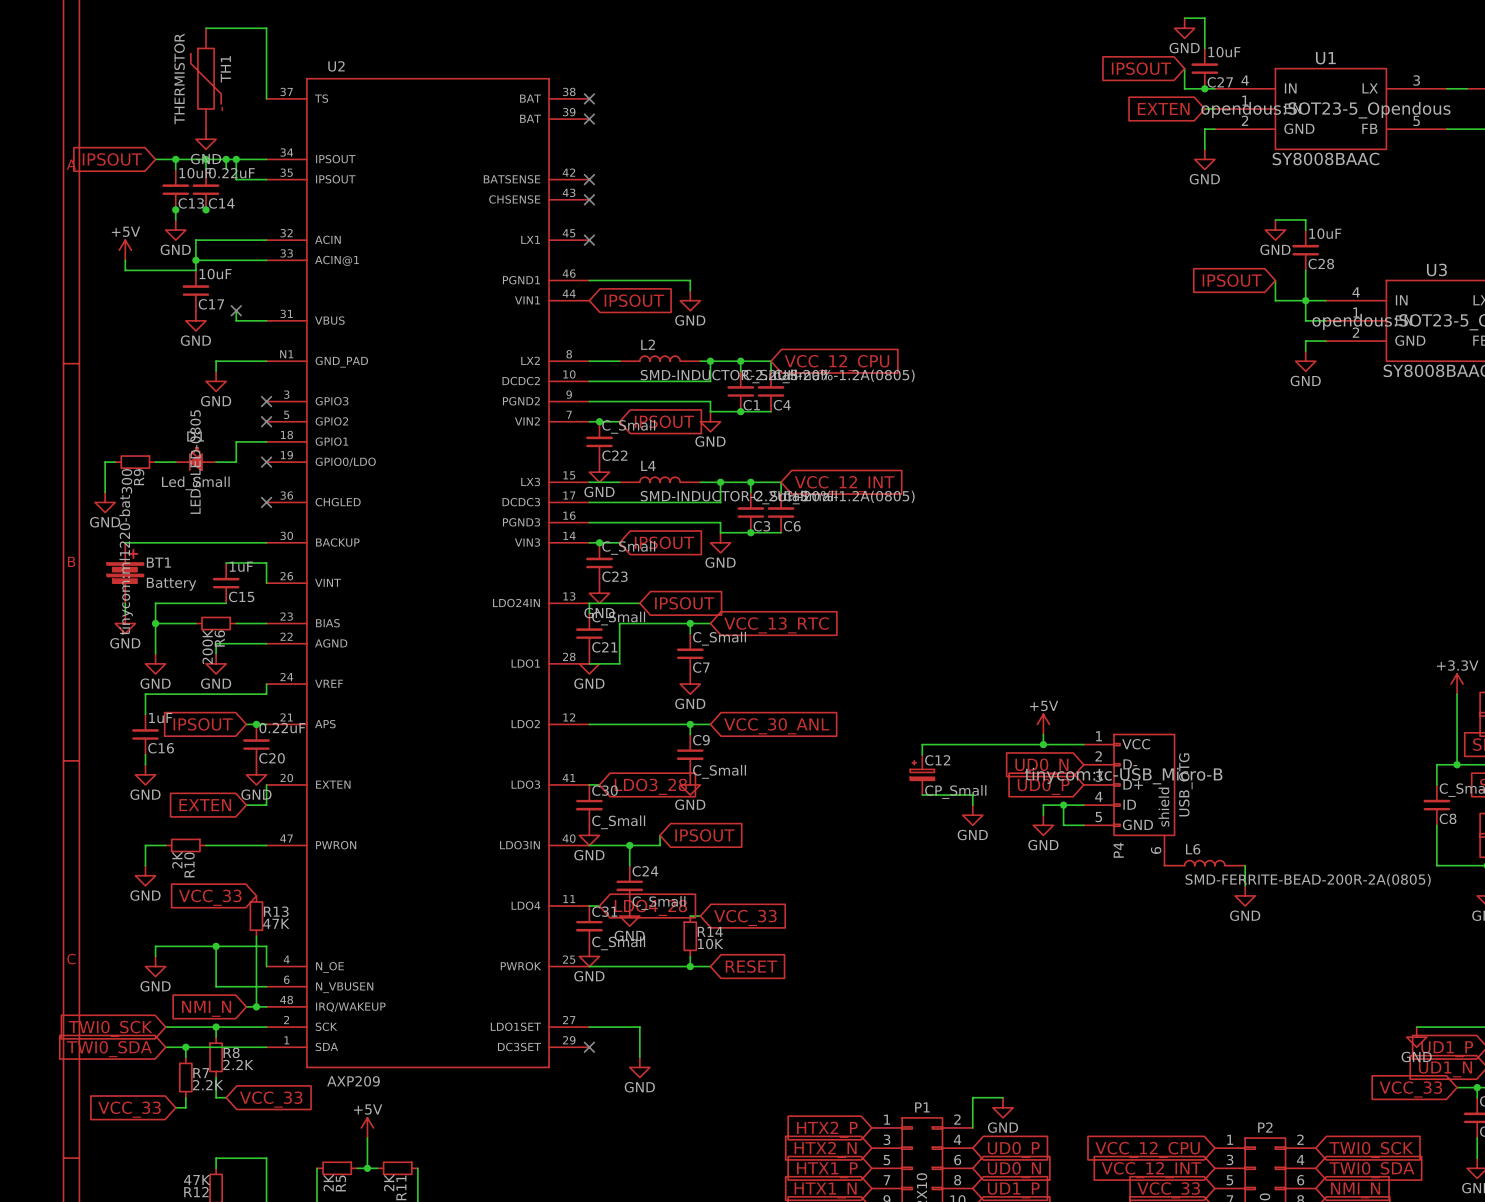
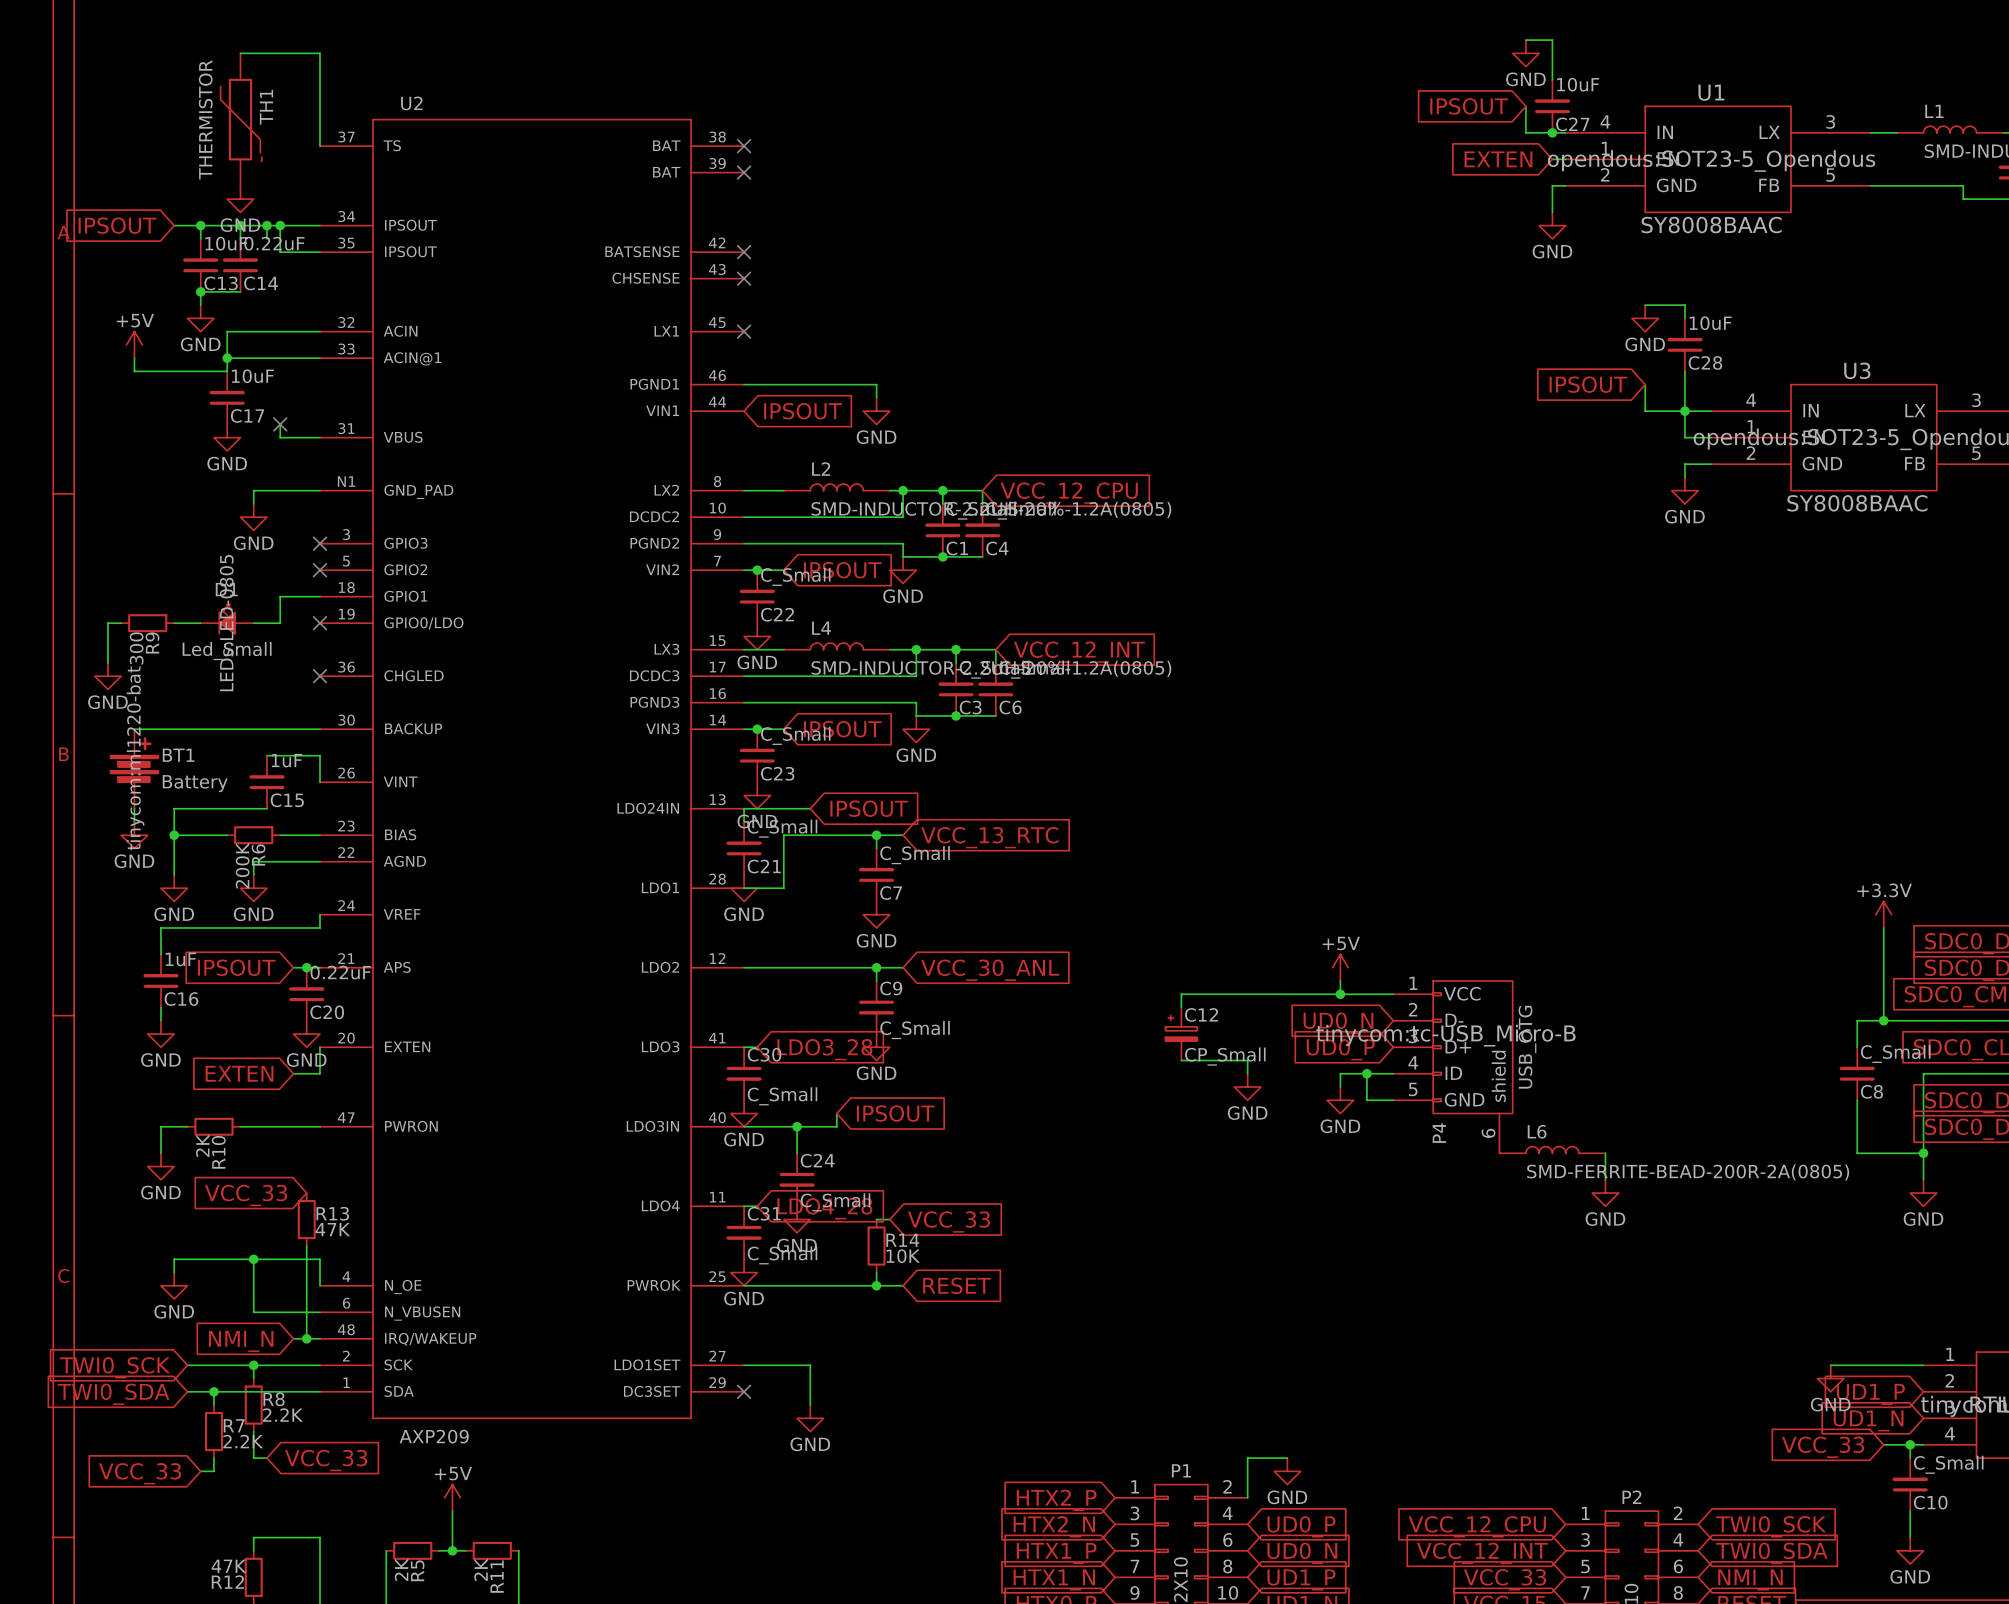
wire: none -> (200, 291) (240, 291)
junction: (206, 209) -> none

